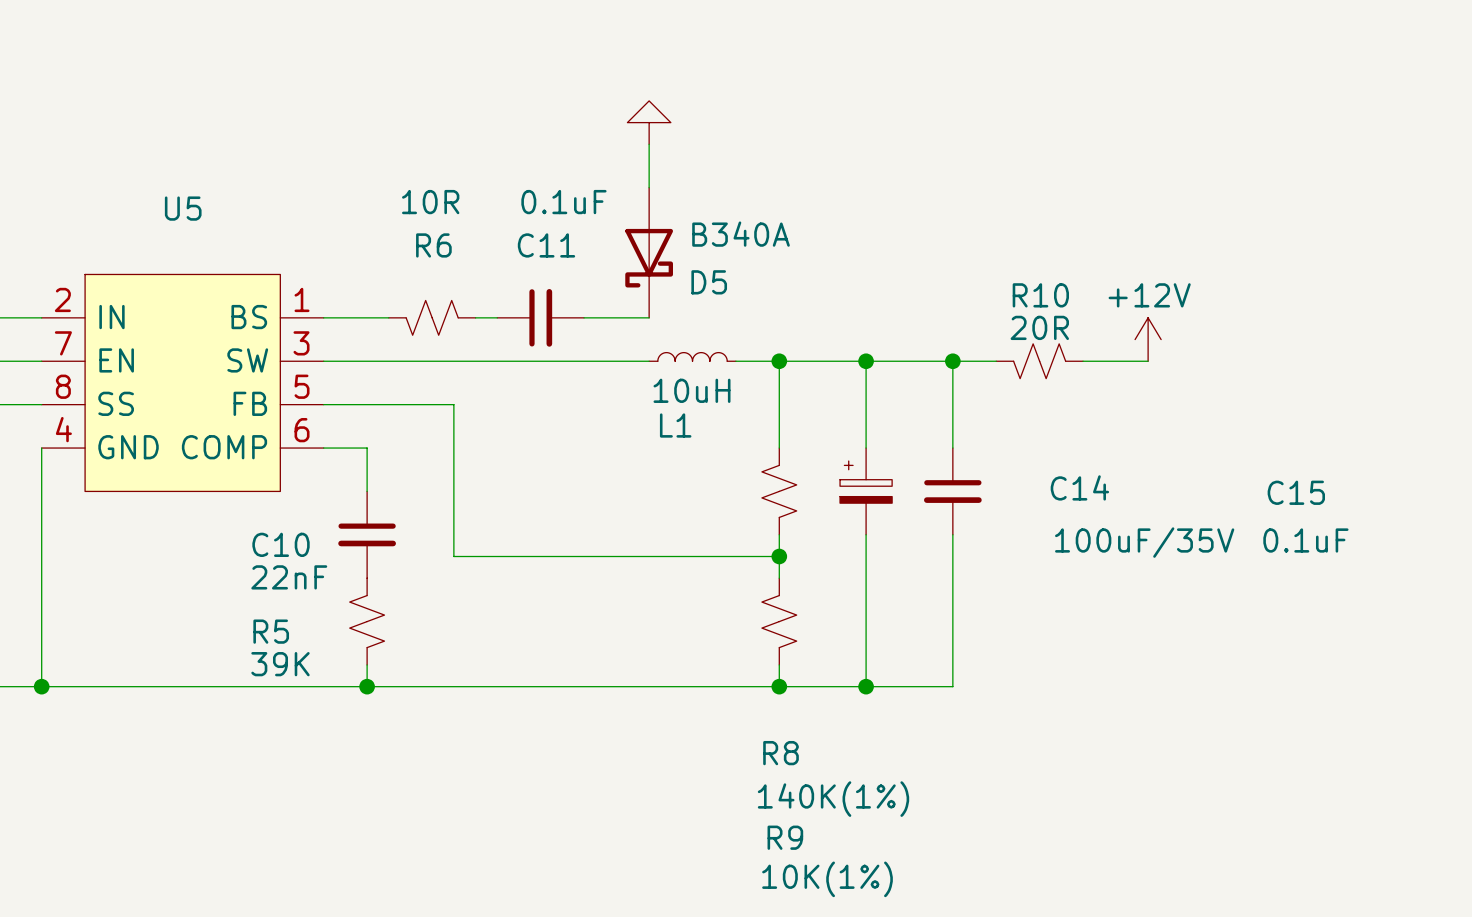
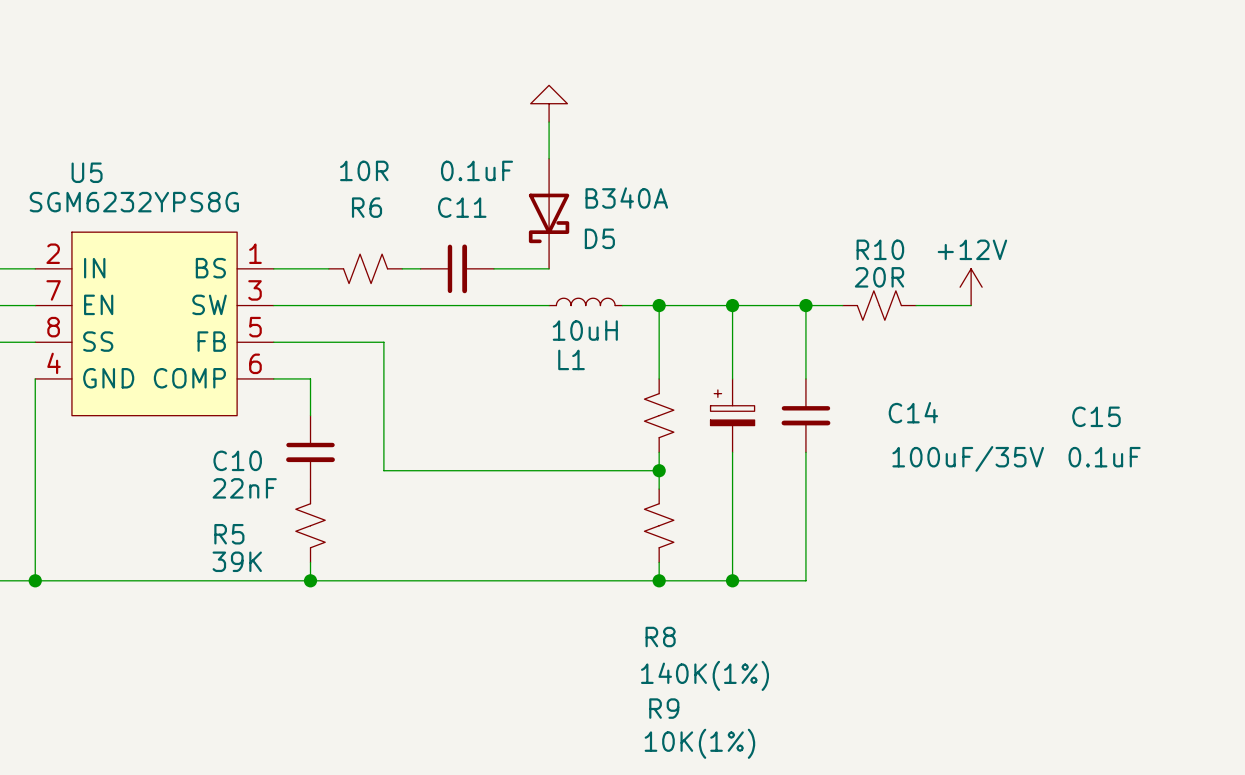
U5 name position: U5 (183, 208) -> U5 (87, 172)
U5 value: none -> SGM6232YPS8G (134, 202)

